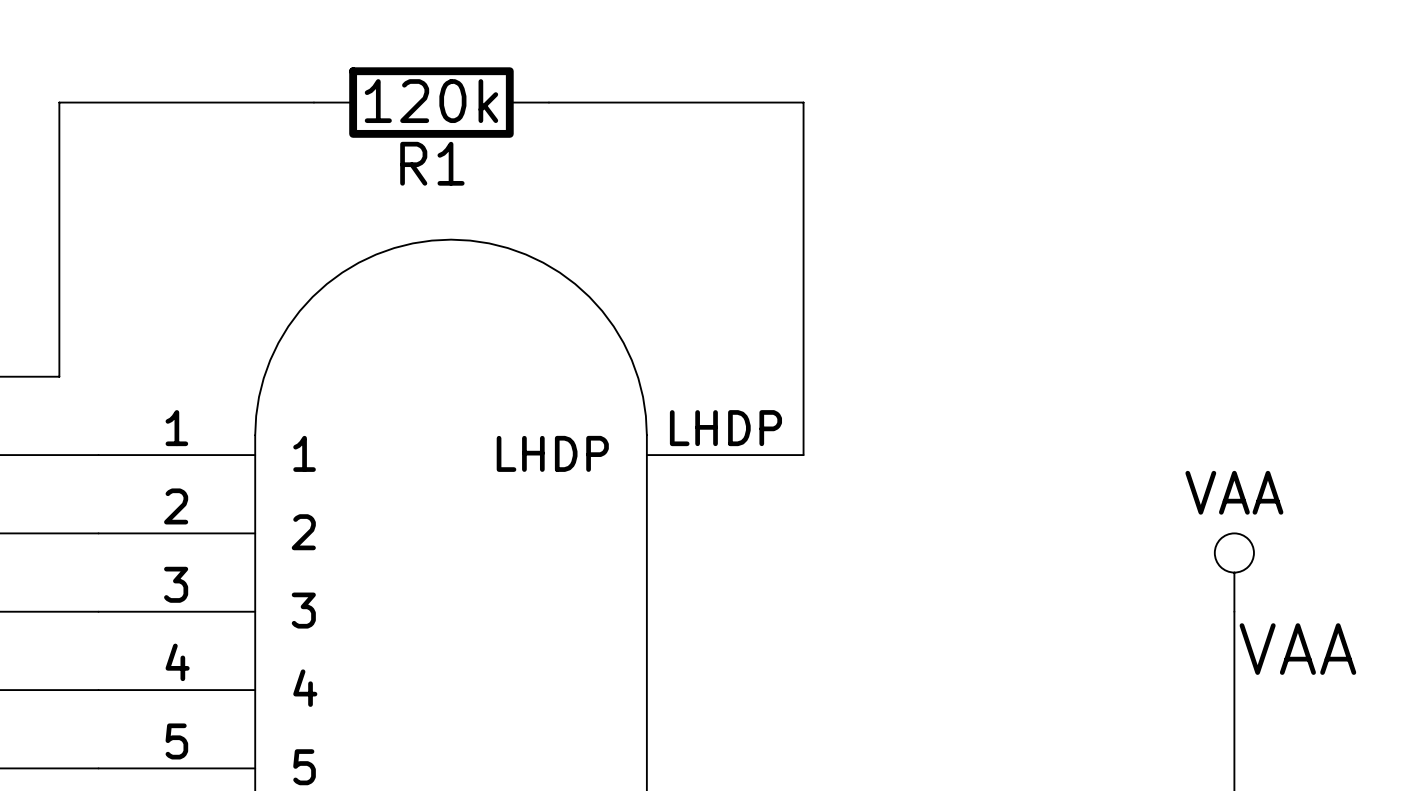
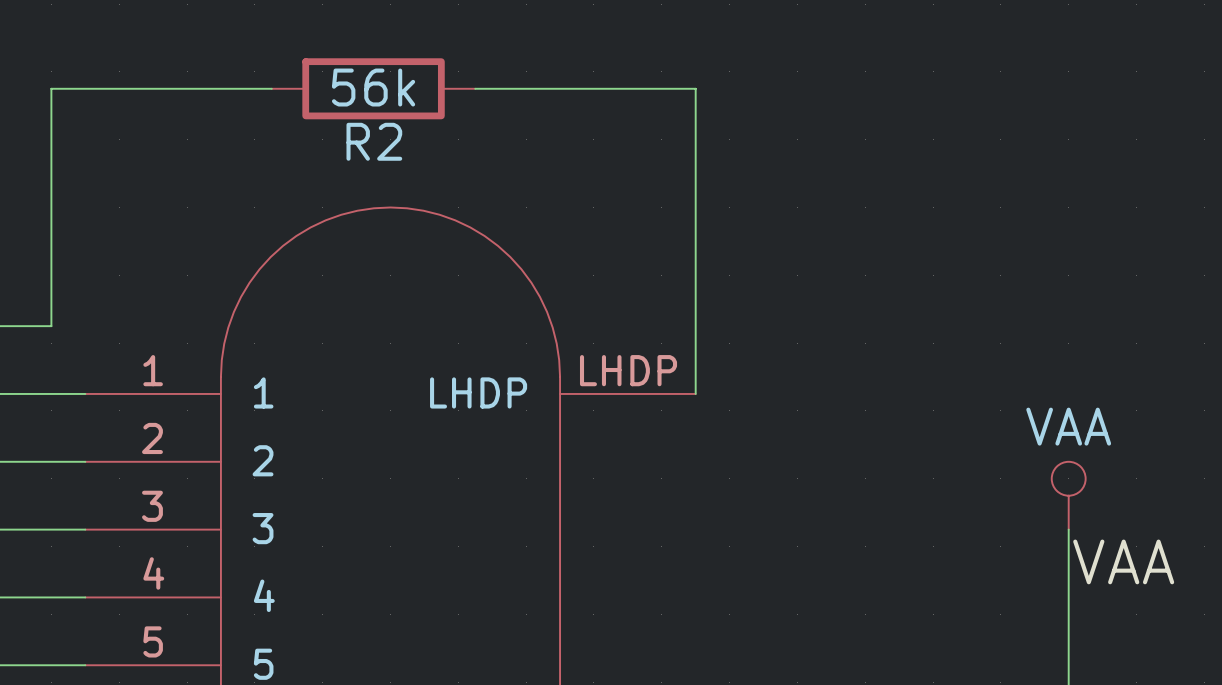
R1 value: 120k (431, 101) -> 56k (373, 87)
R1 name: R1 (432, 163) -> R2 (374, 141)

